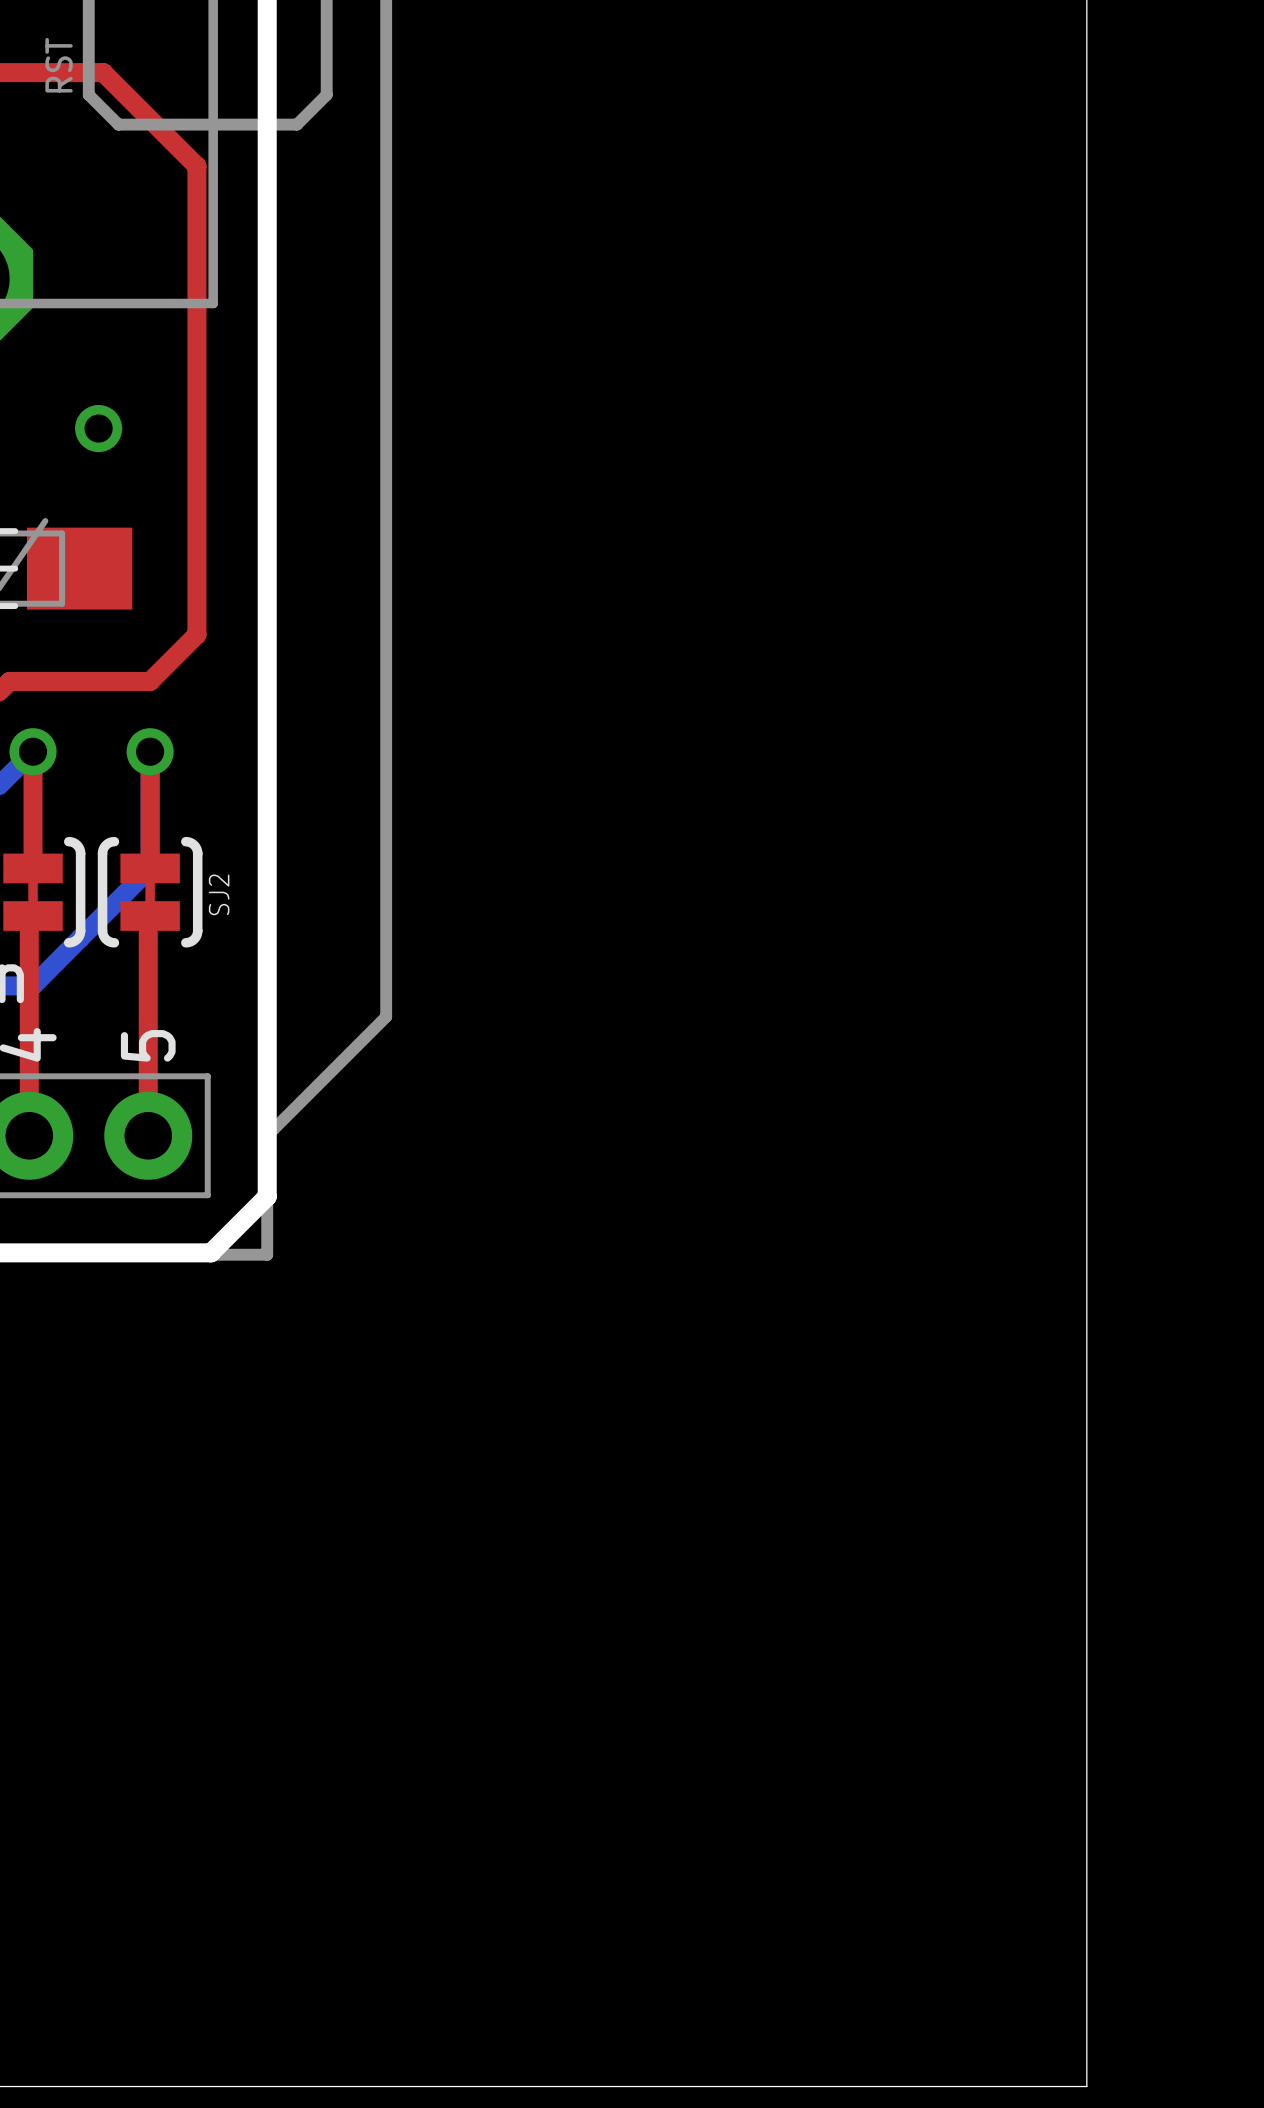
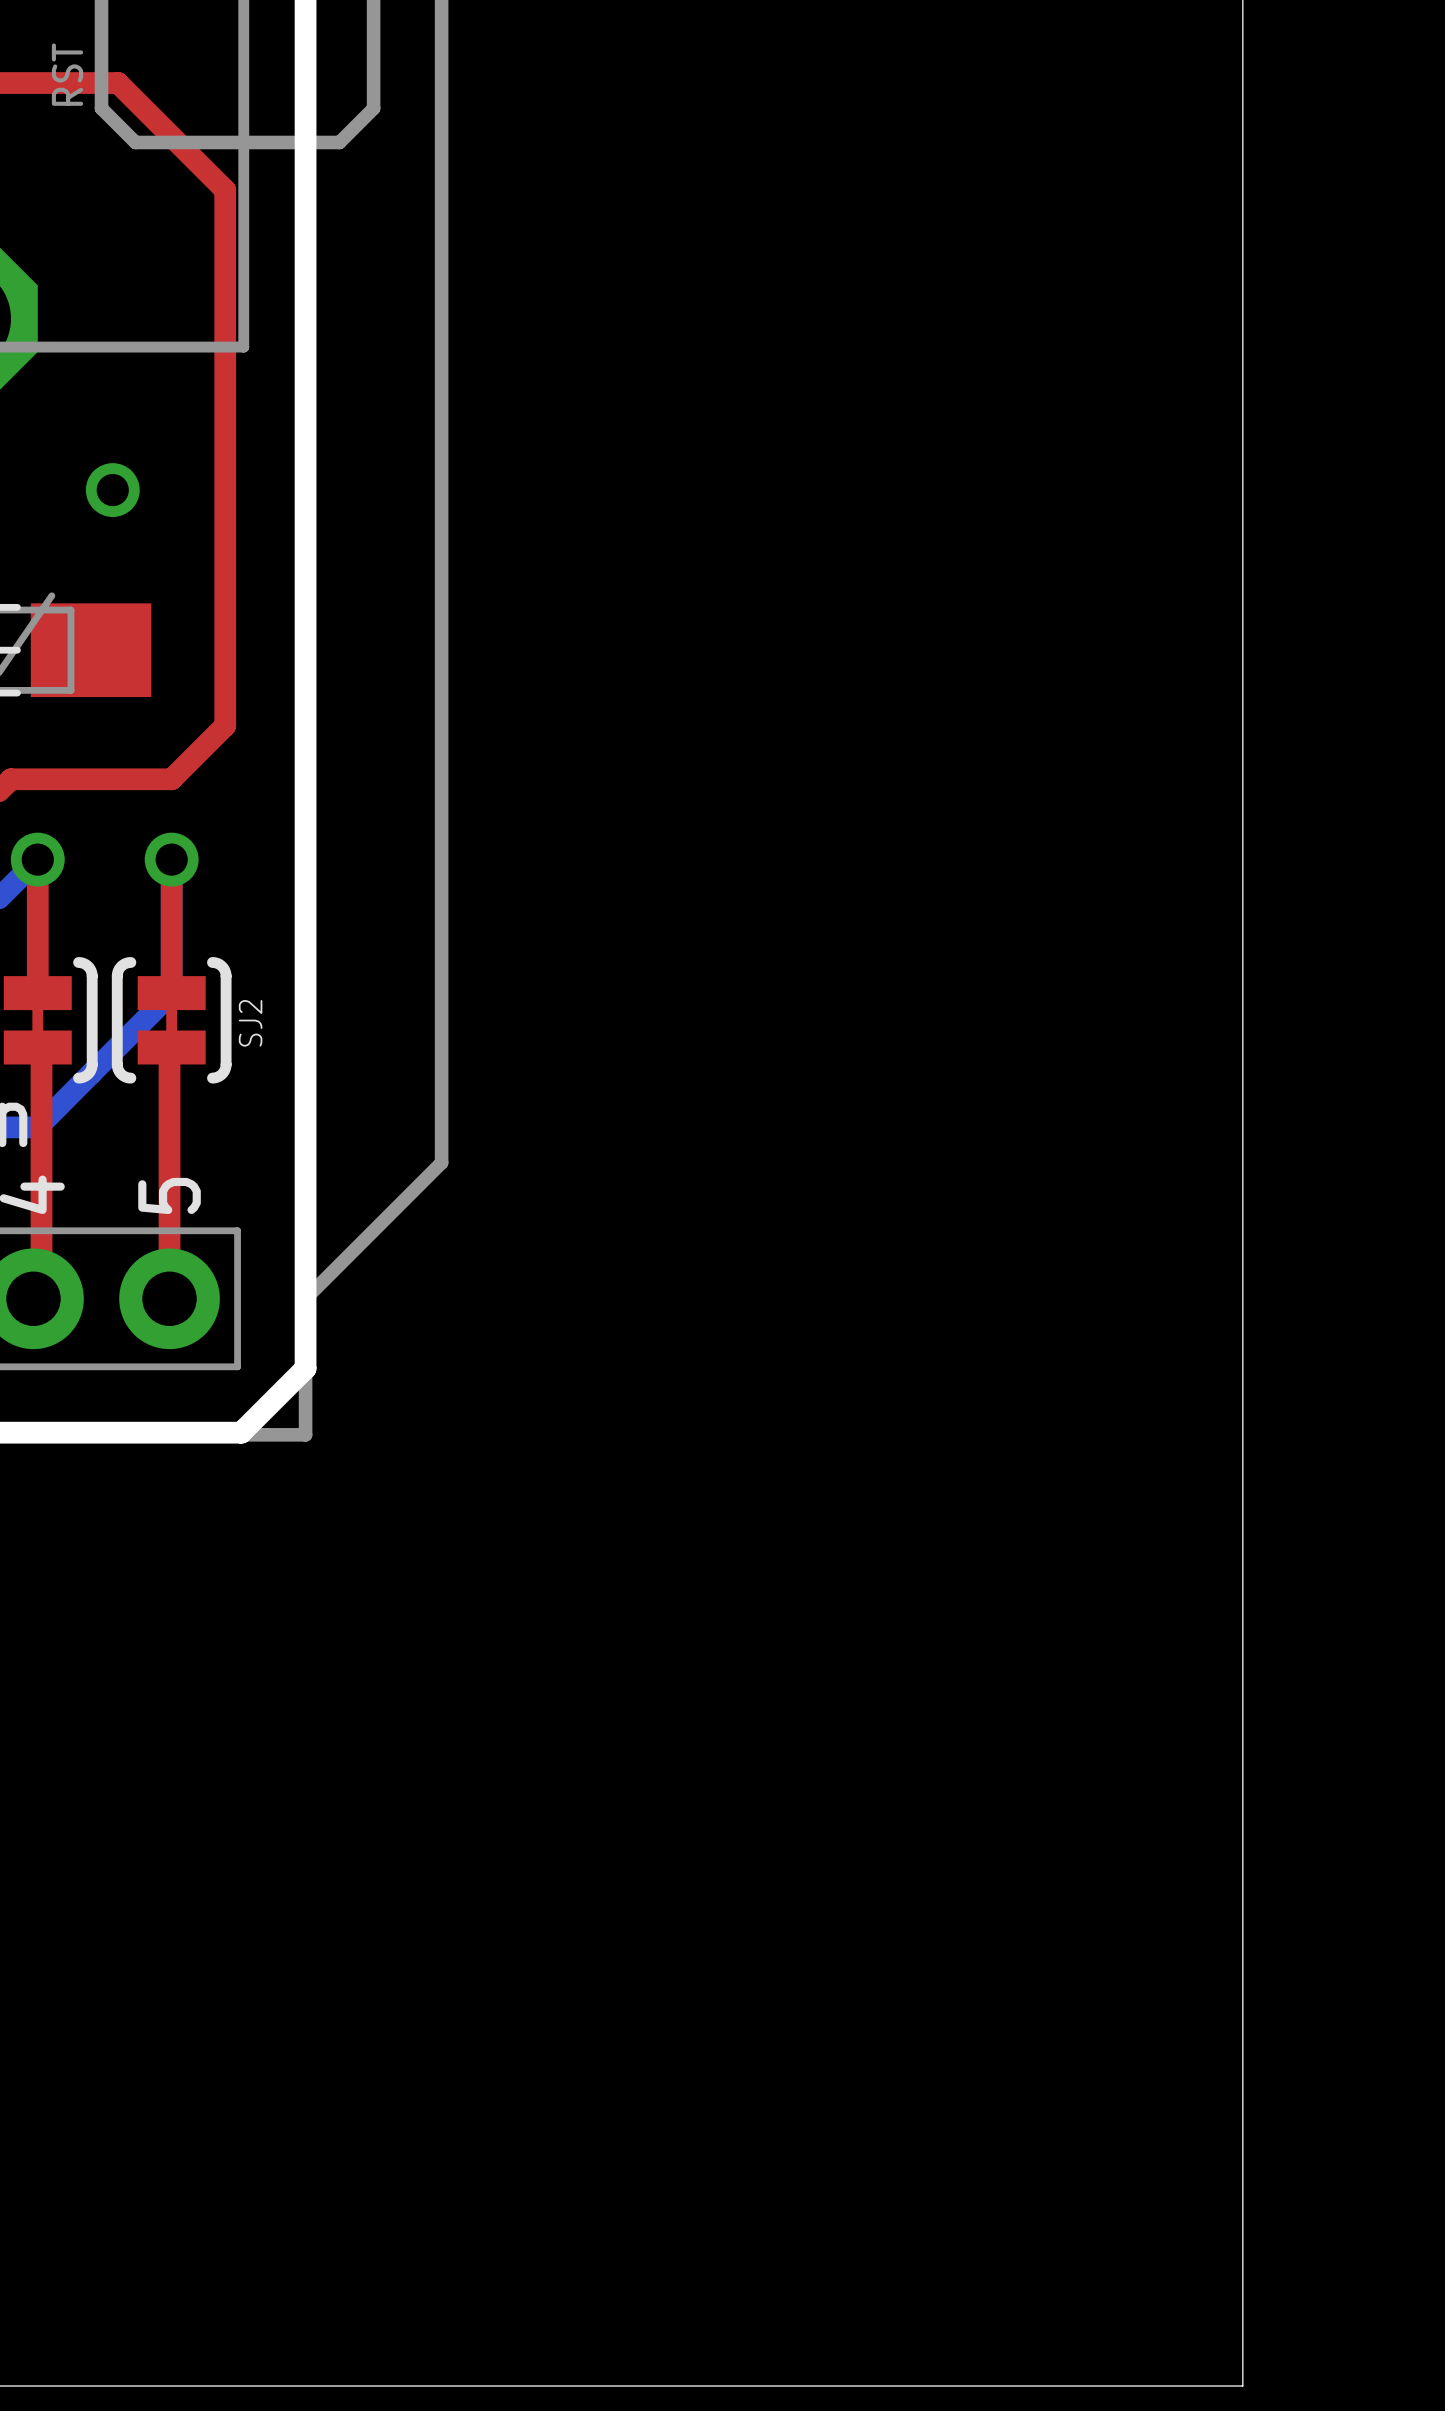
top track: none -> (37, 1047) (41, 1051) (41, 1298)
top track: (31, 917) (29, 919) (29, 1135) -> none

